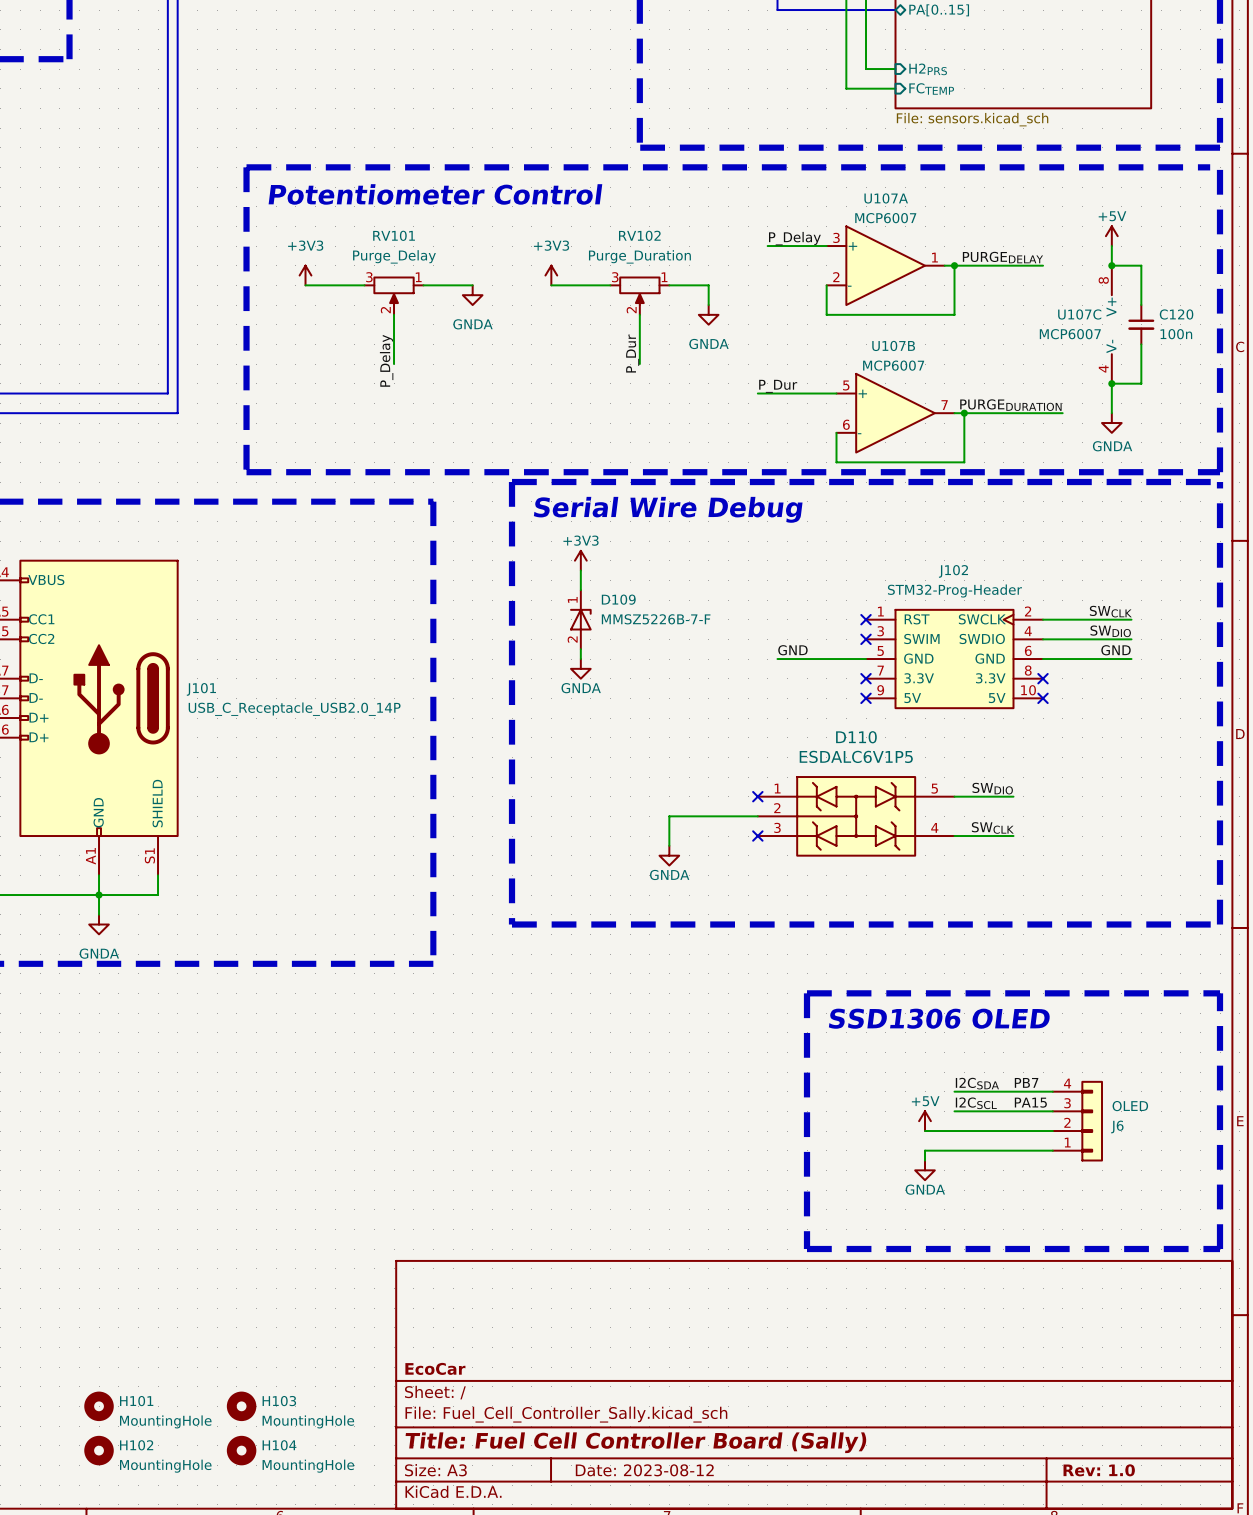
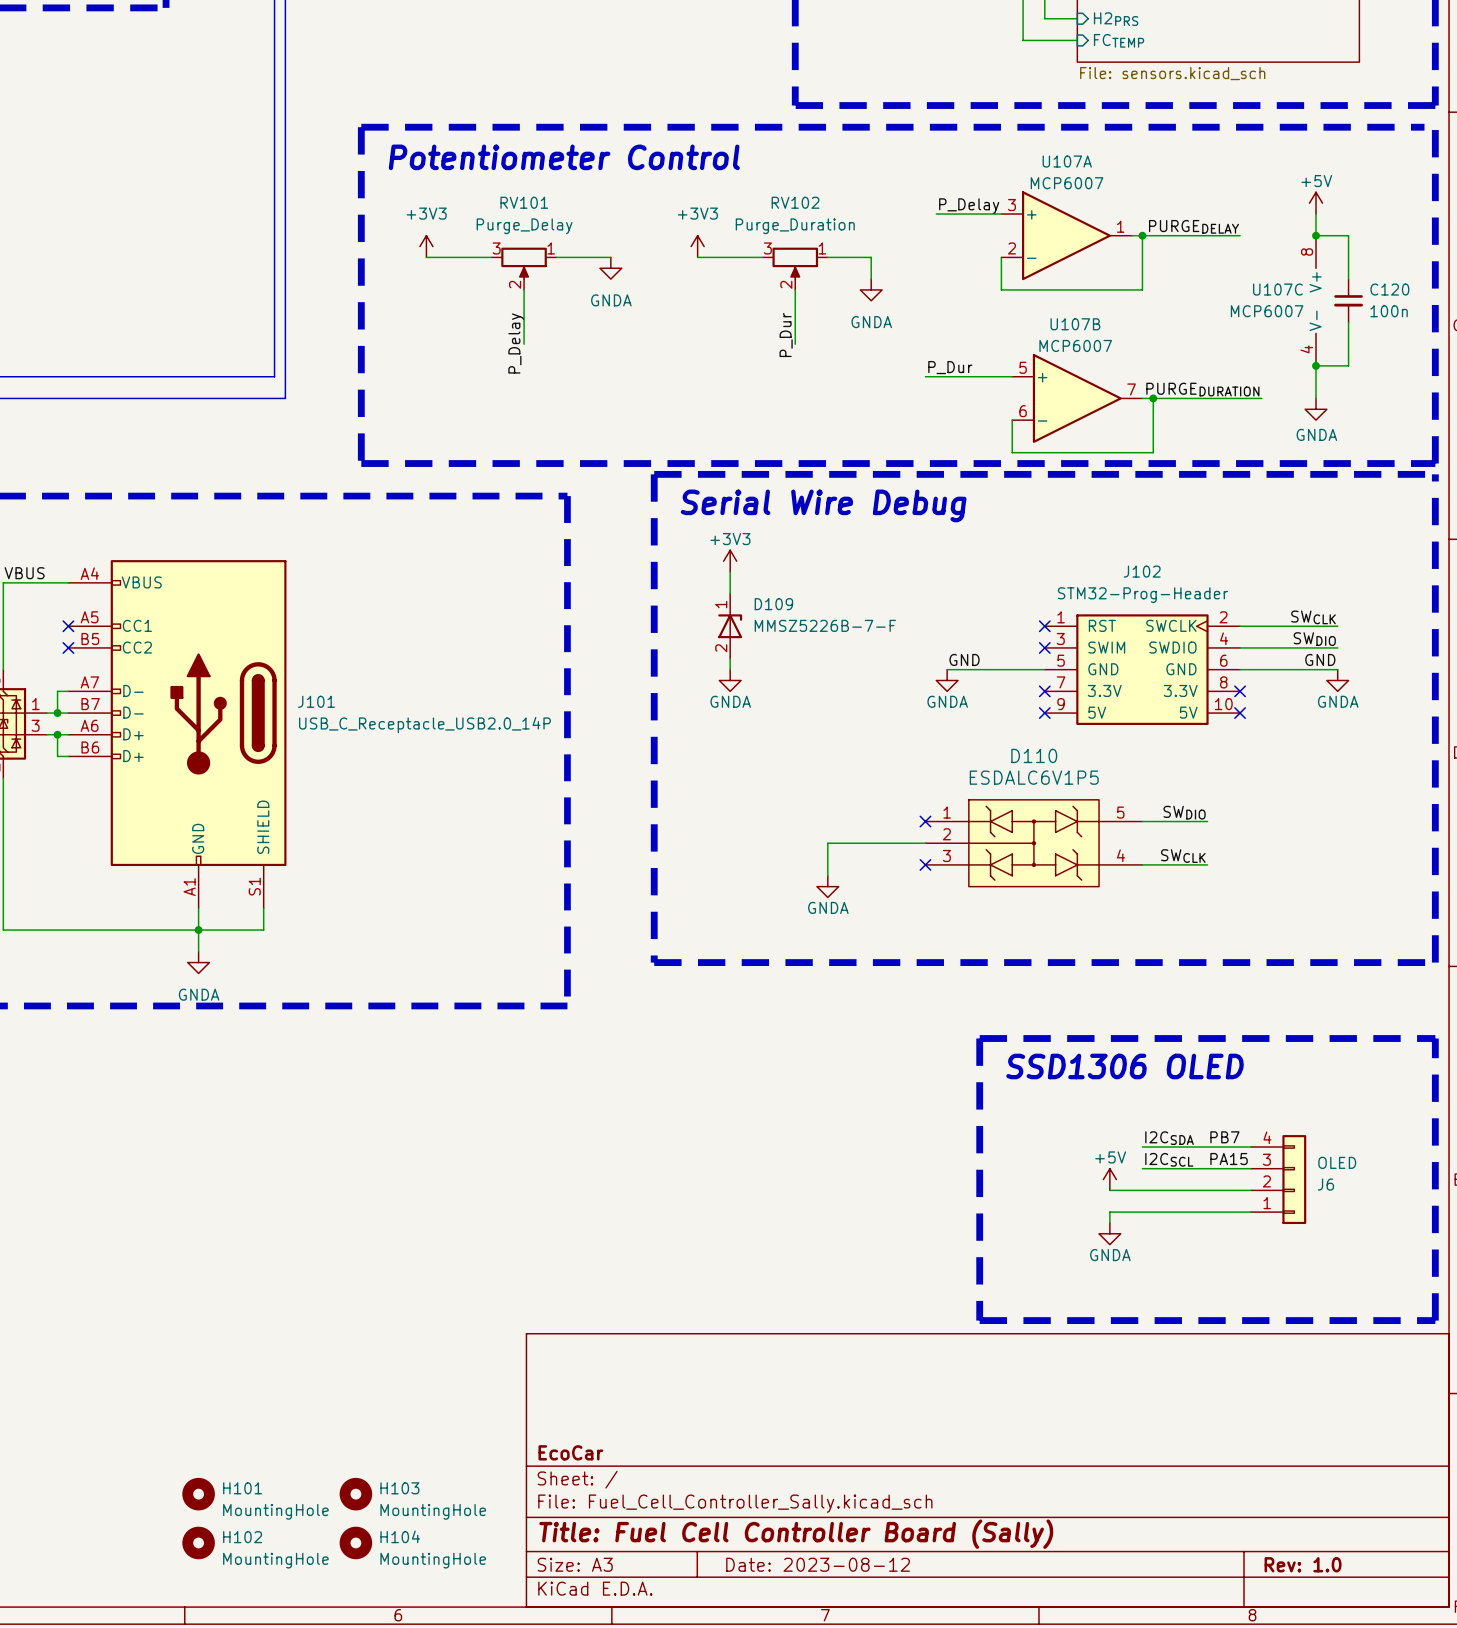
power symbol: none -> GNDA (947, 680)
power symbol: none -> GNDA (1337, 680)

